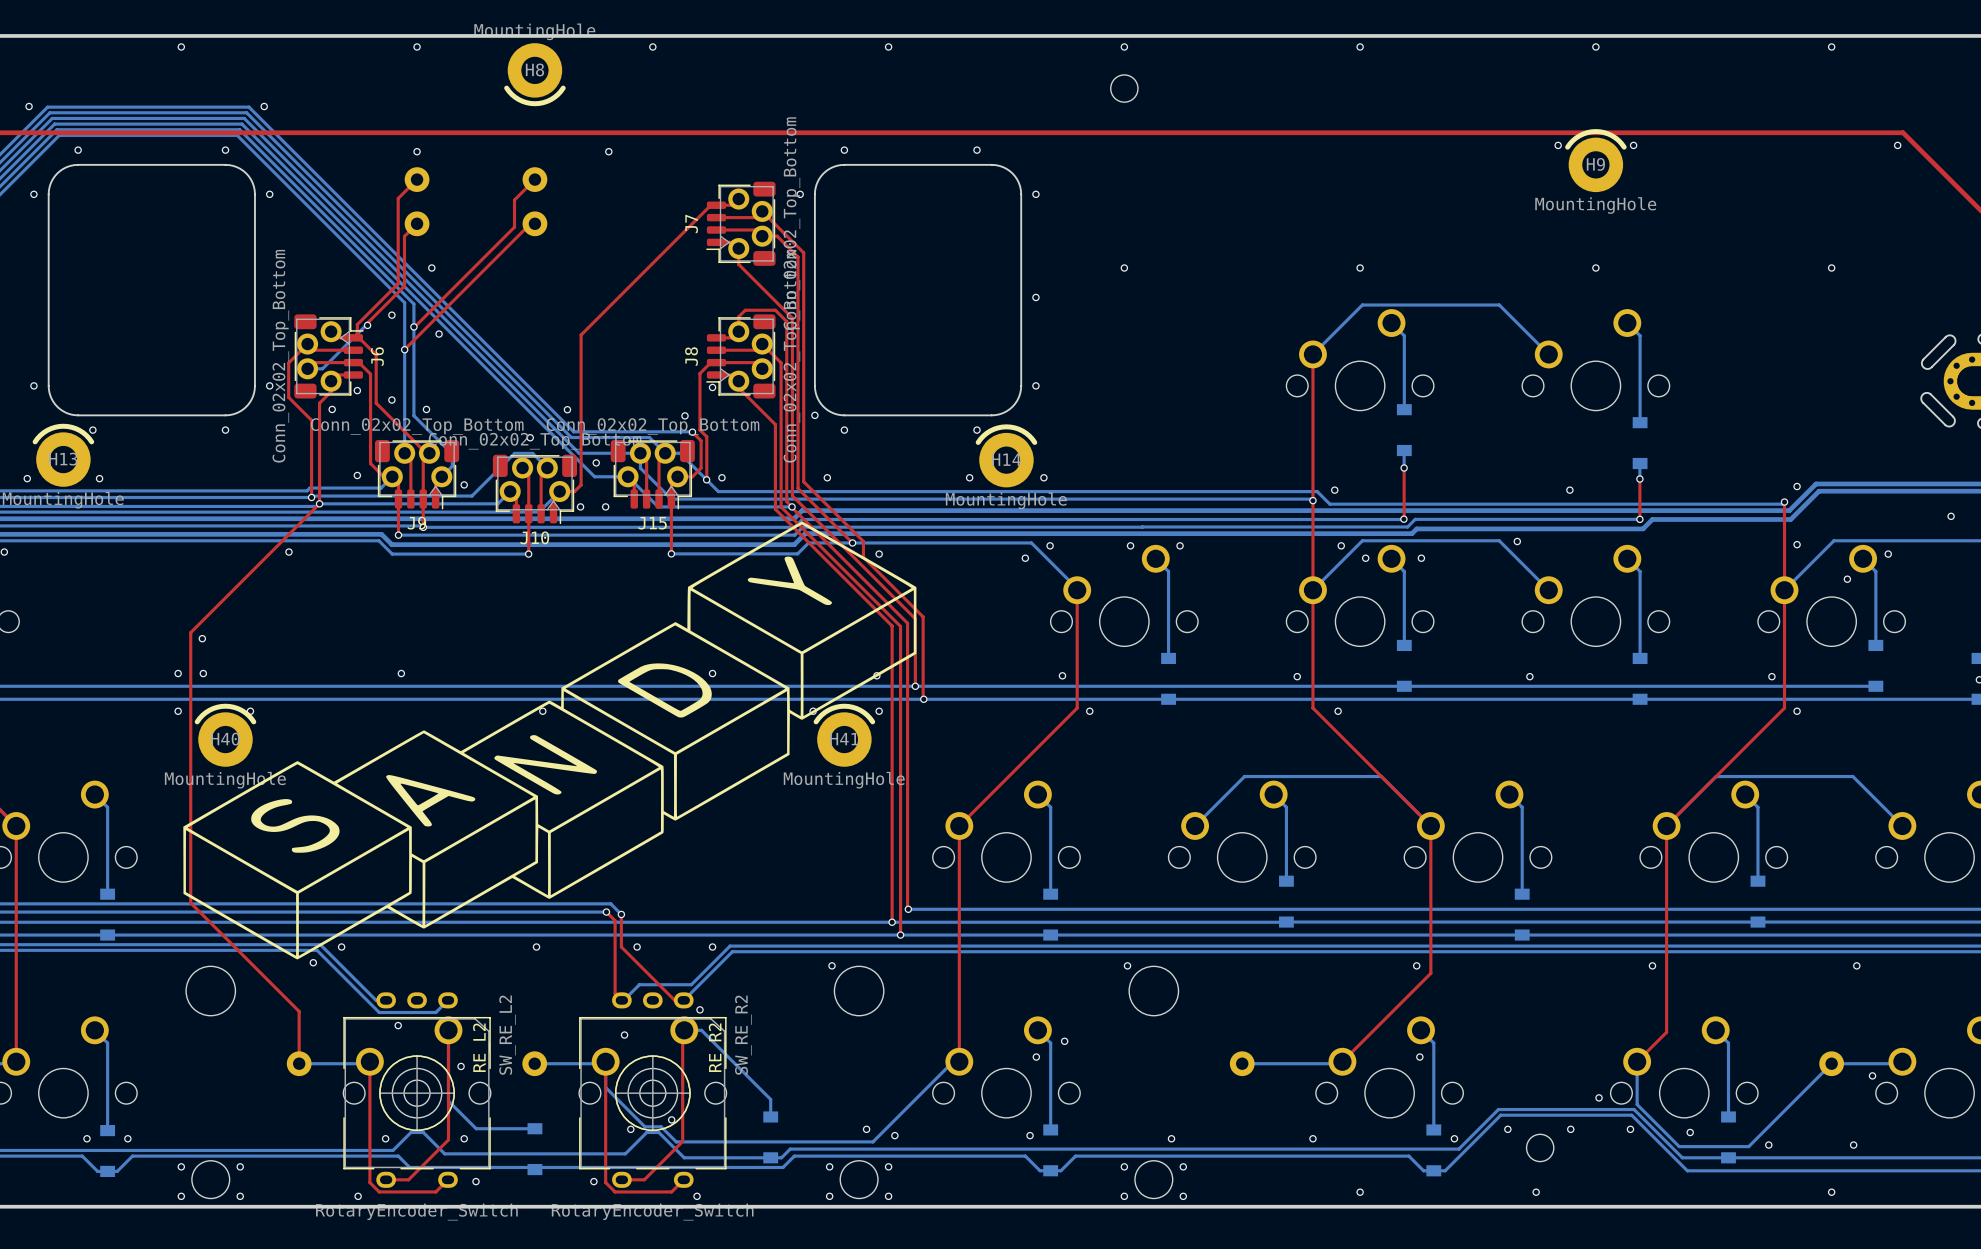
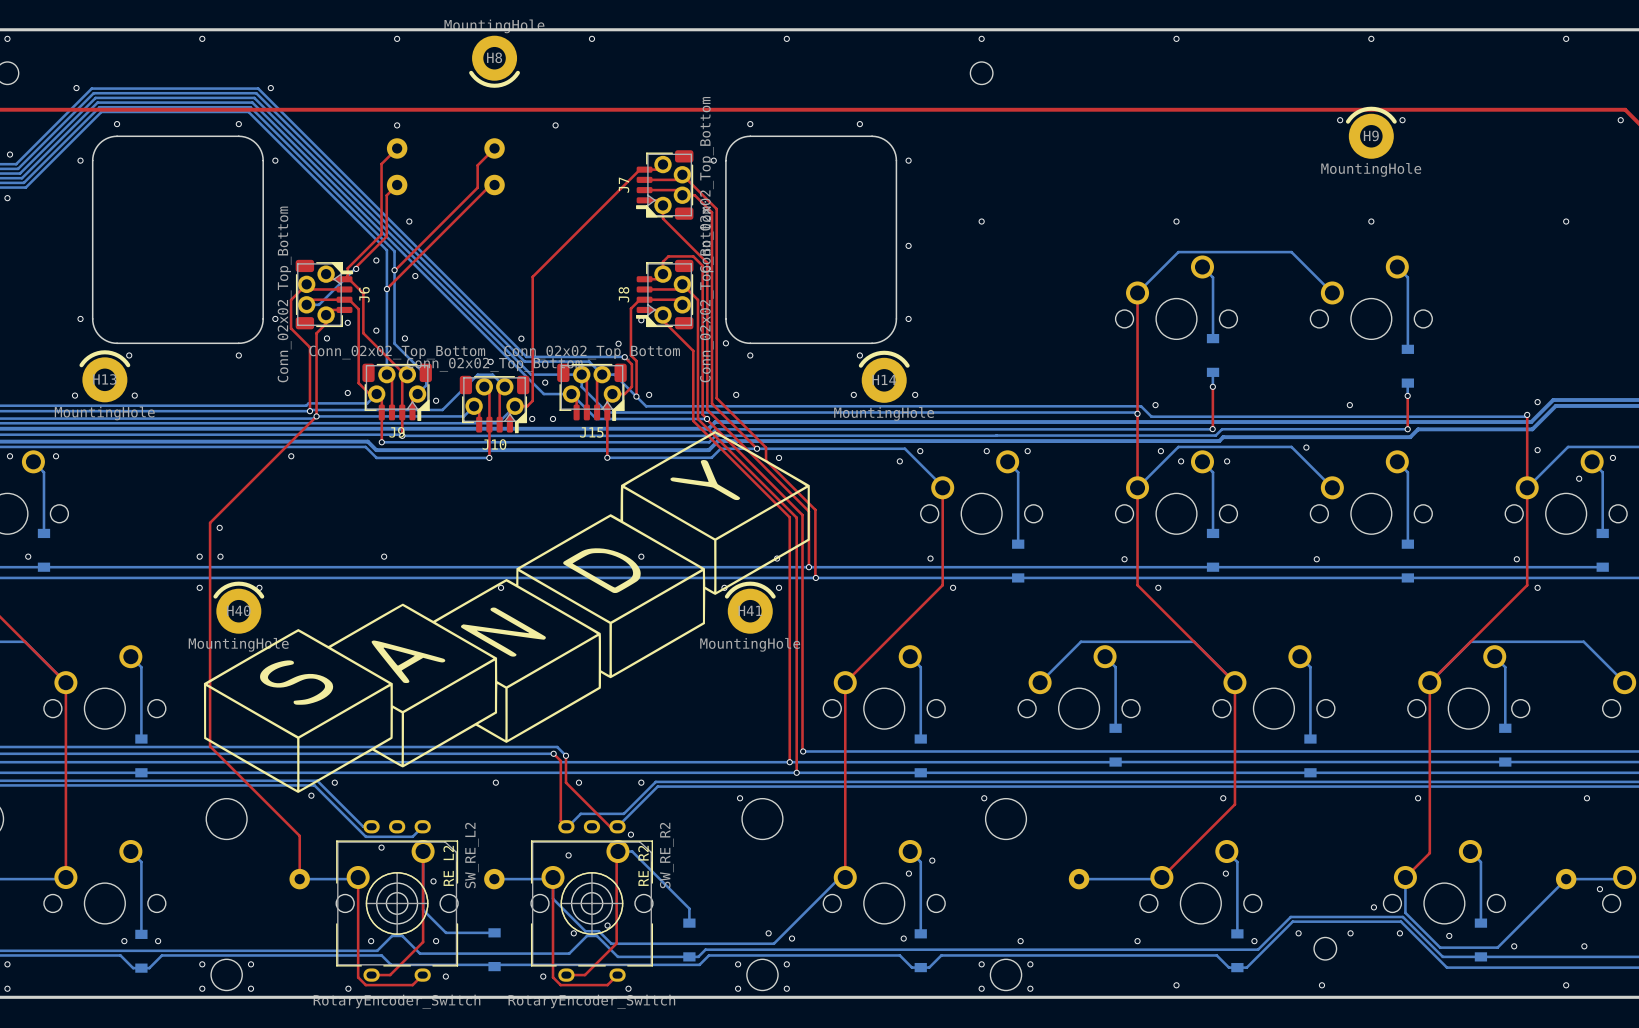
J7 footprint: [706, 181, 776, 266] -> [636, 150, 694, 220]
J6 footprint: [294, 314, 364, 399] -> [295, 259, 354, 330]
J8 footprint: [706, 314, 776, 399] -> [636, 259, 694, 330]
J9 footprint: [374, 439, 460, 510] -> [362, 363, 432, 422]
J15 footprint: [610, 439, 695, 510] -> [557, 363, 627, 422]
J10 footprint: [492, 454, 578, 525] -> [459, 375, 530, 434]

